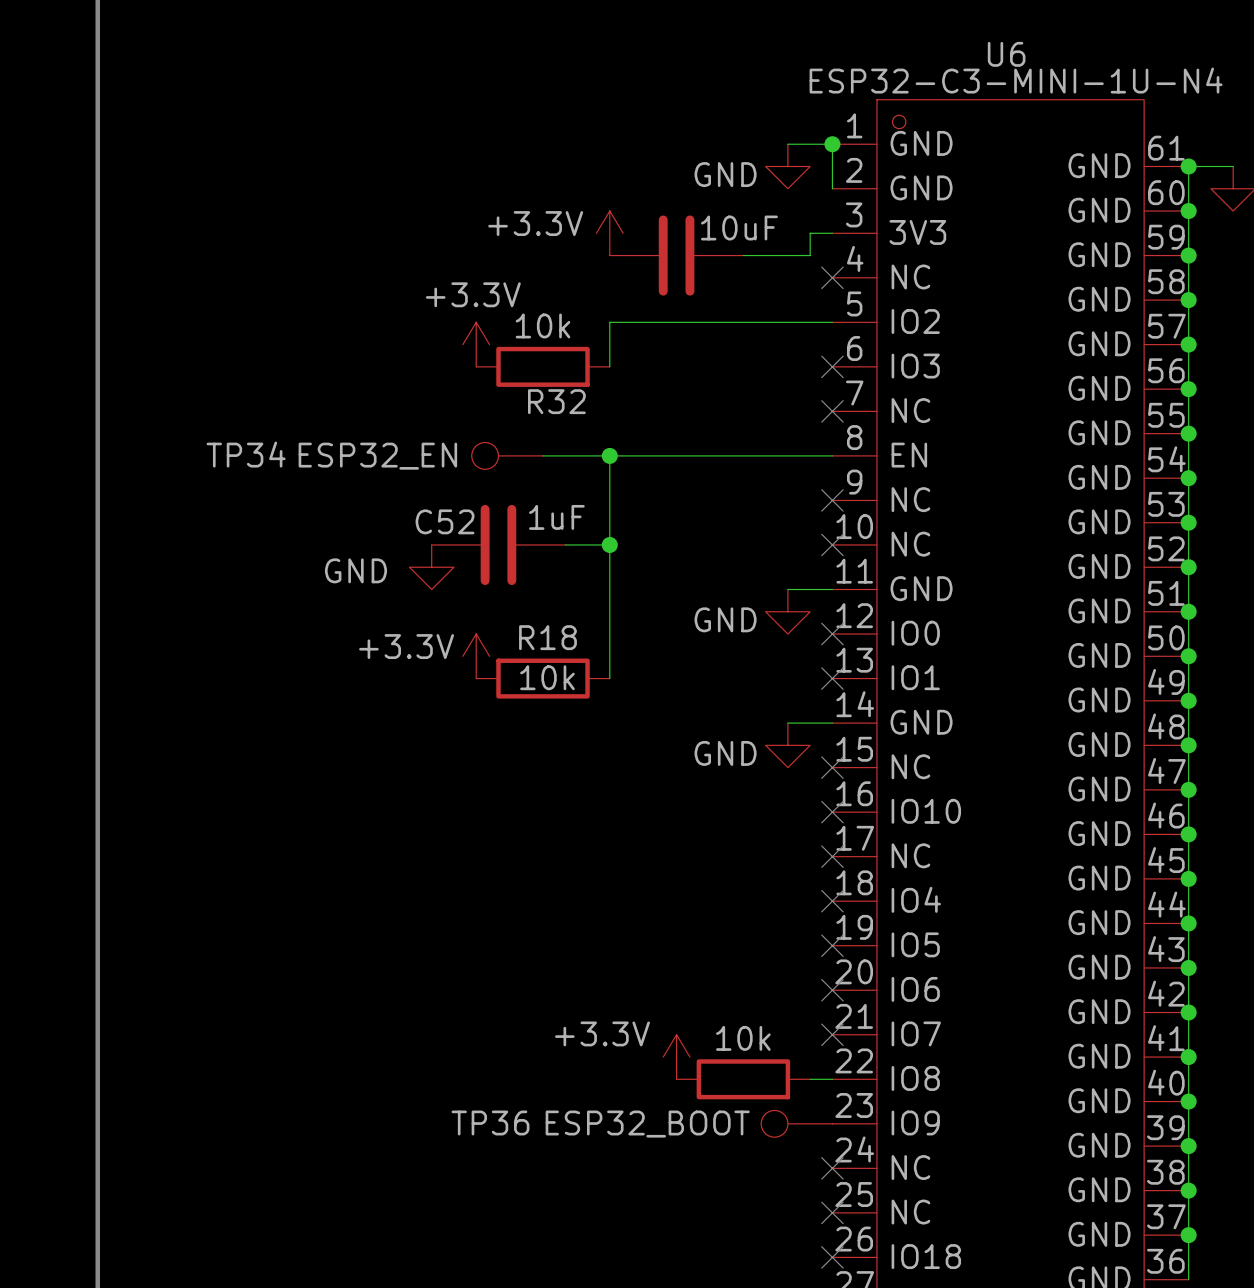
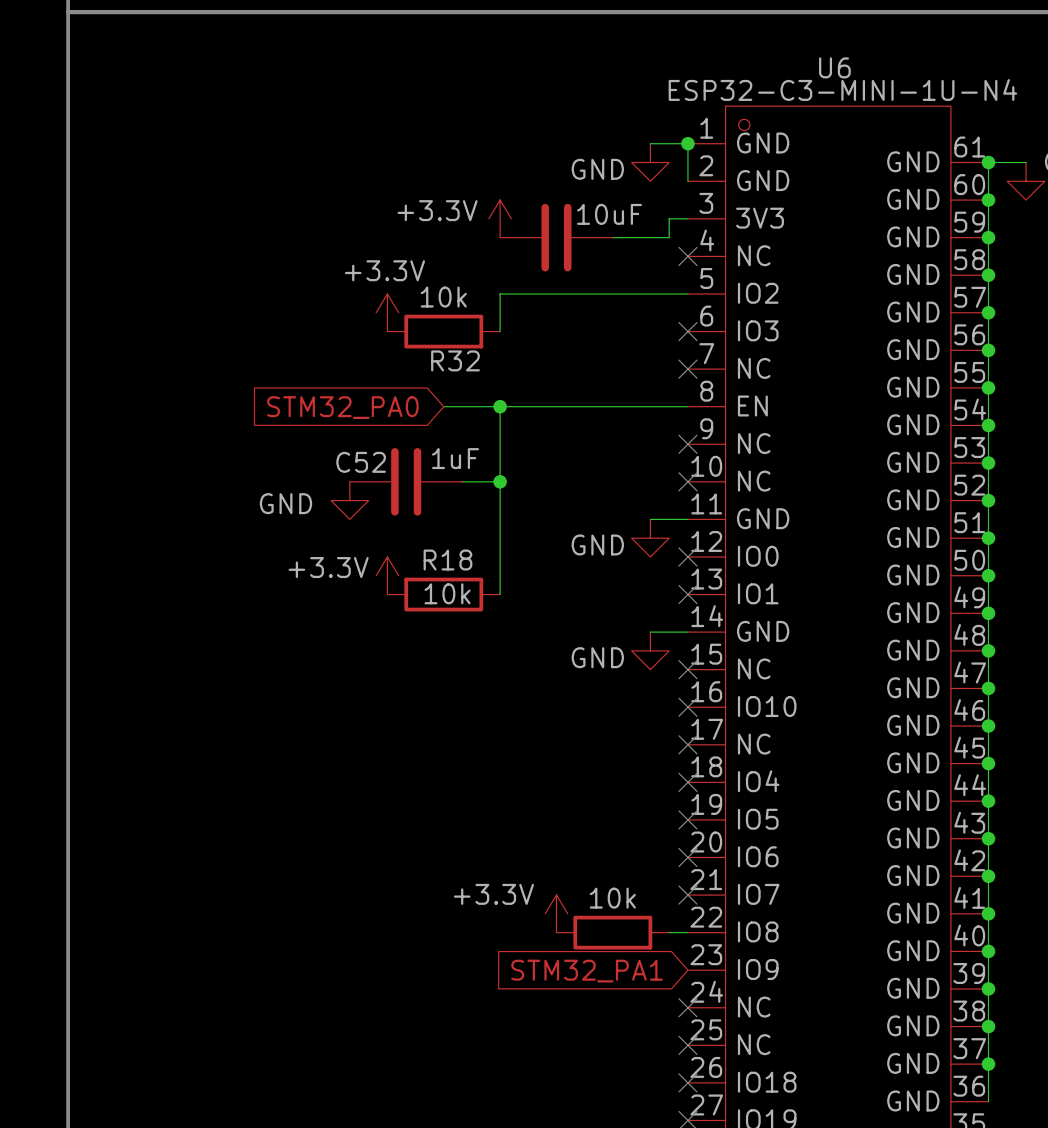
TP34: ESP32_EN (507, 455) -> none
global label: none -> STM32_PA0 (342, 407)
TP36: ESP32_BOOT (796, 1123) -> none
global label: none -> STM32_PA1 (587, 971)

